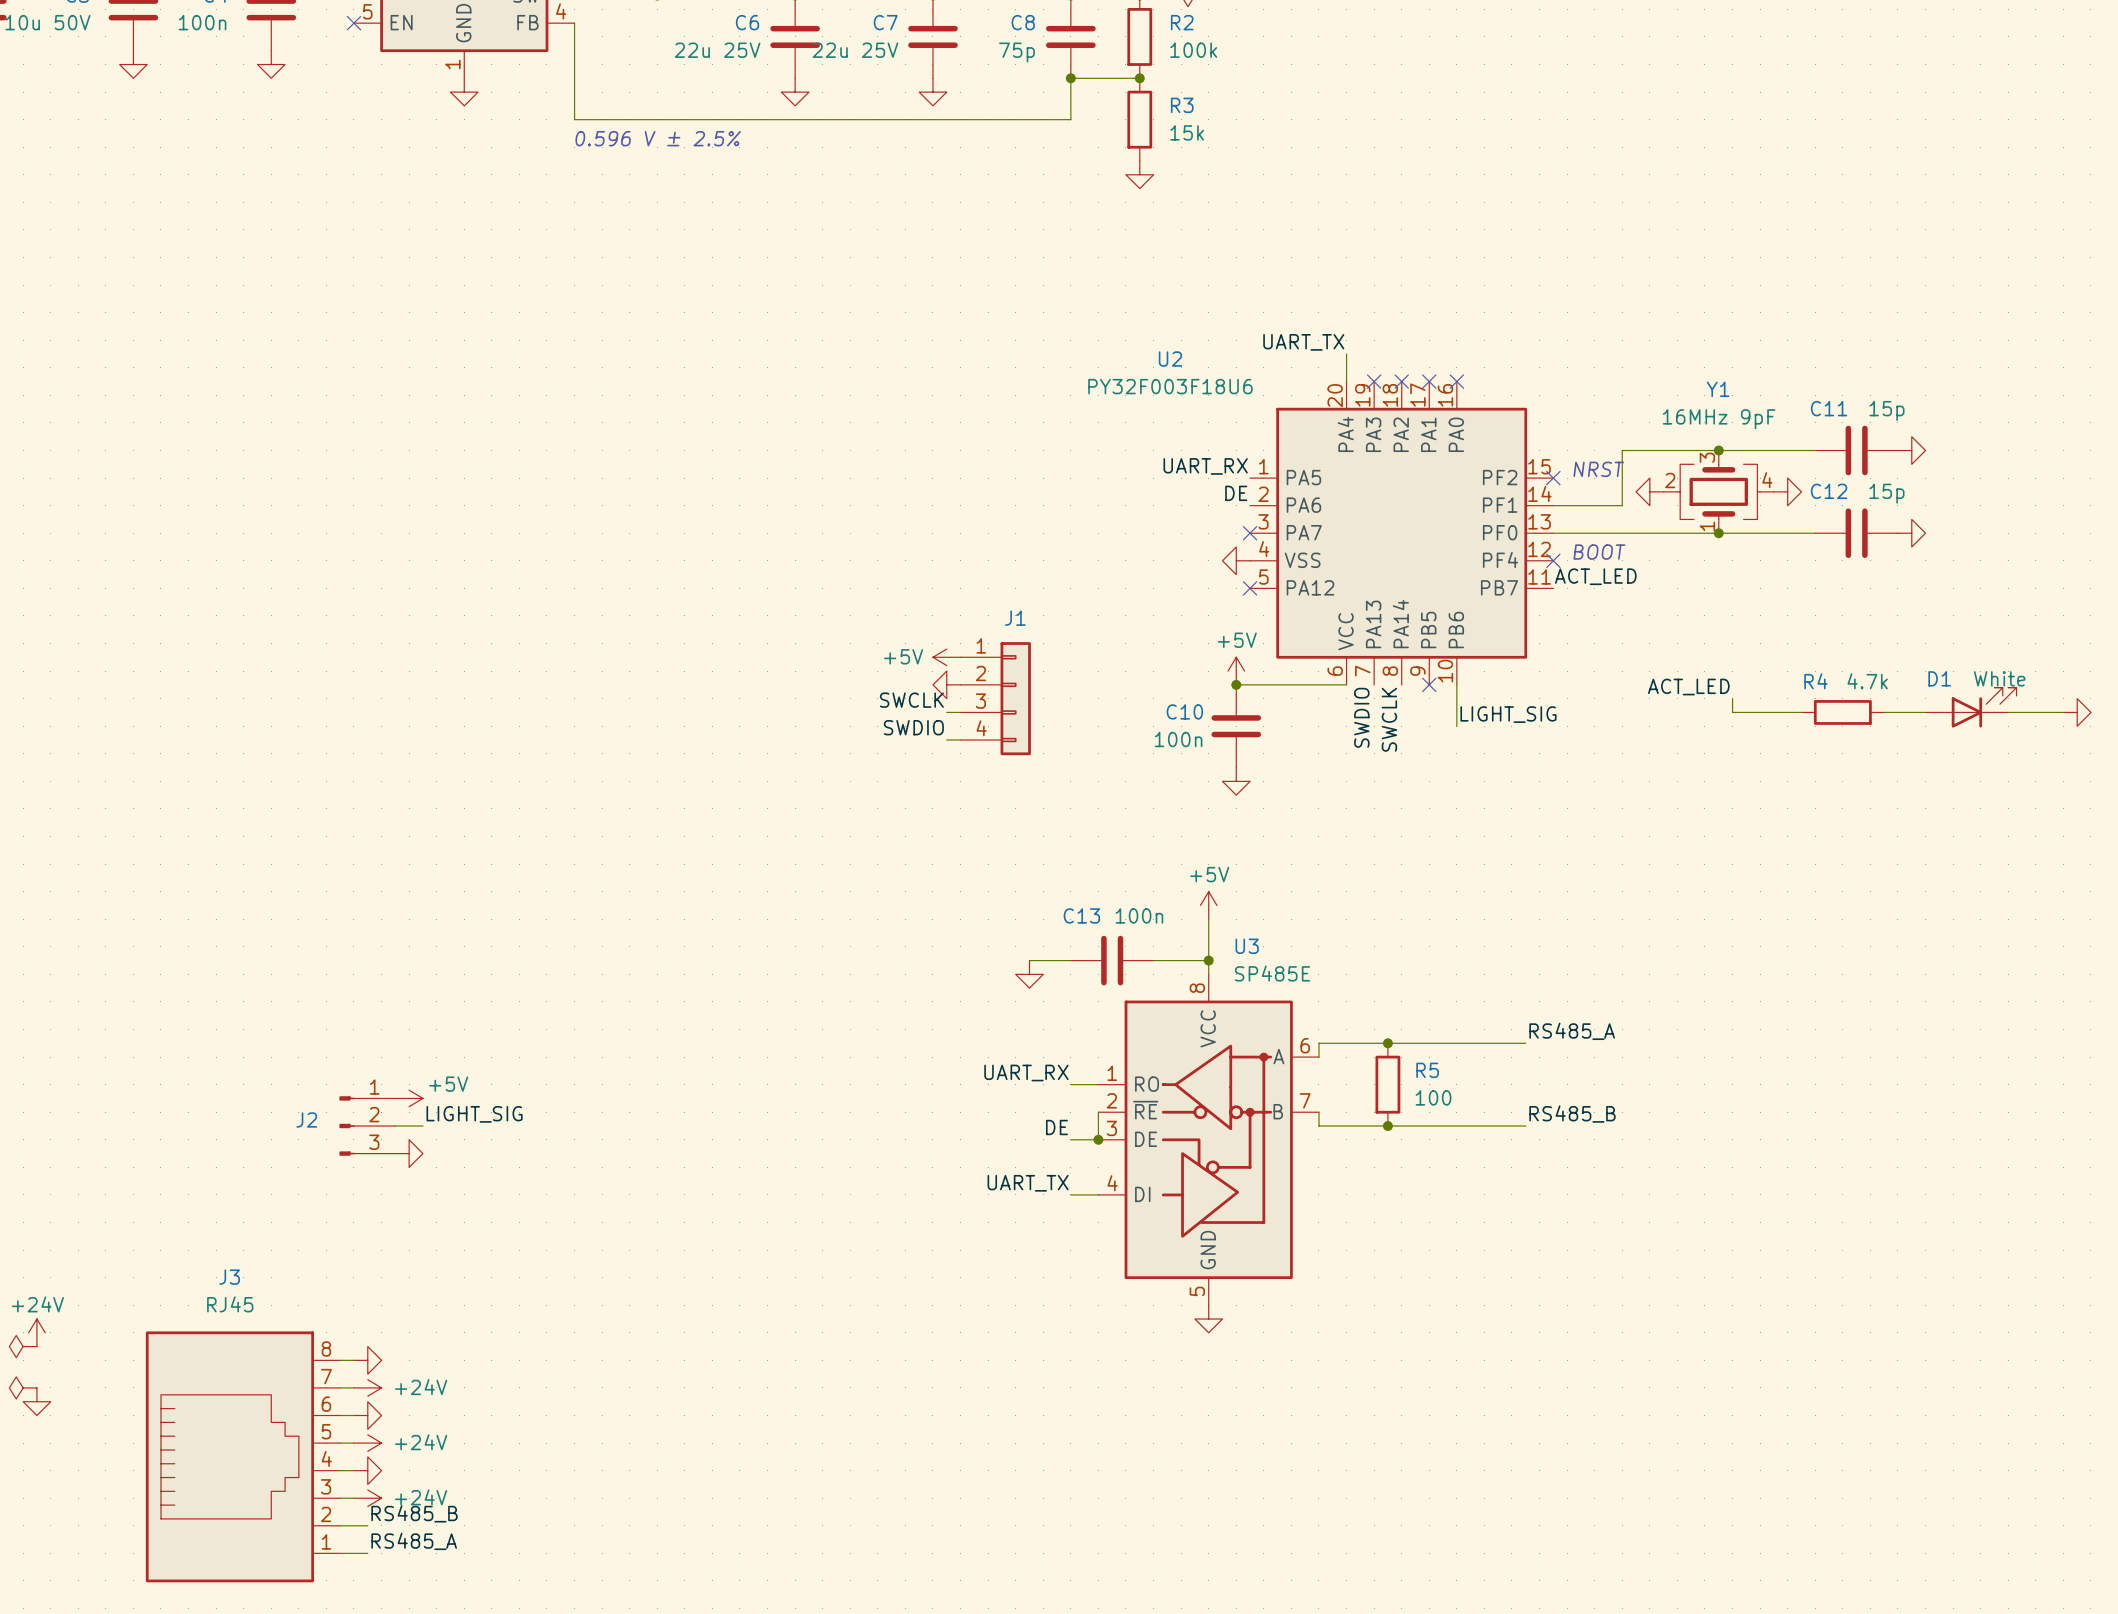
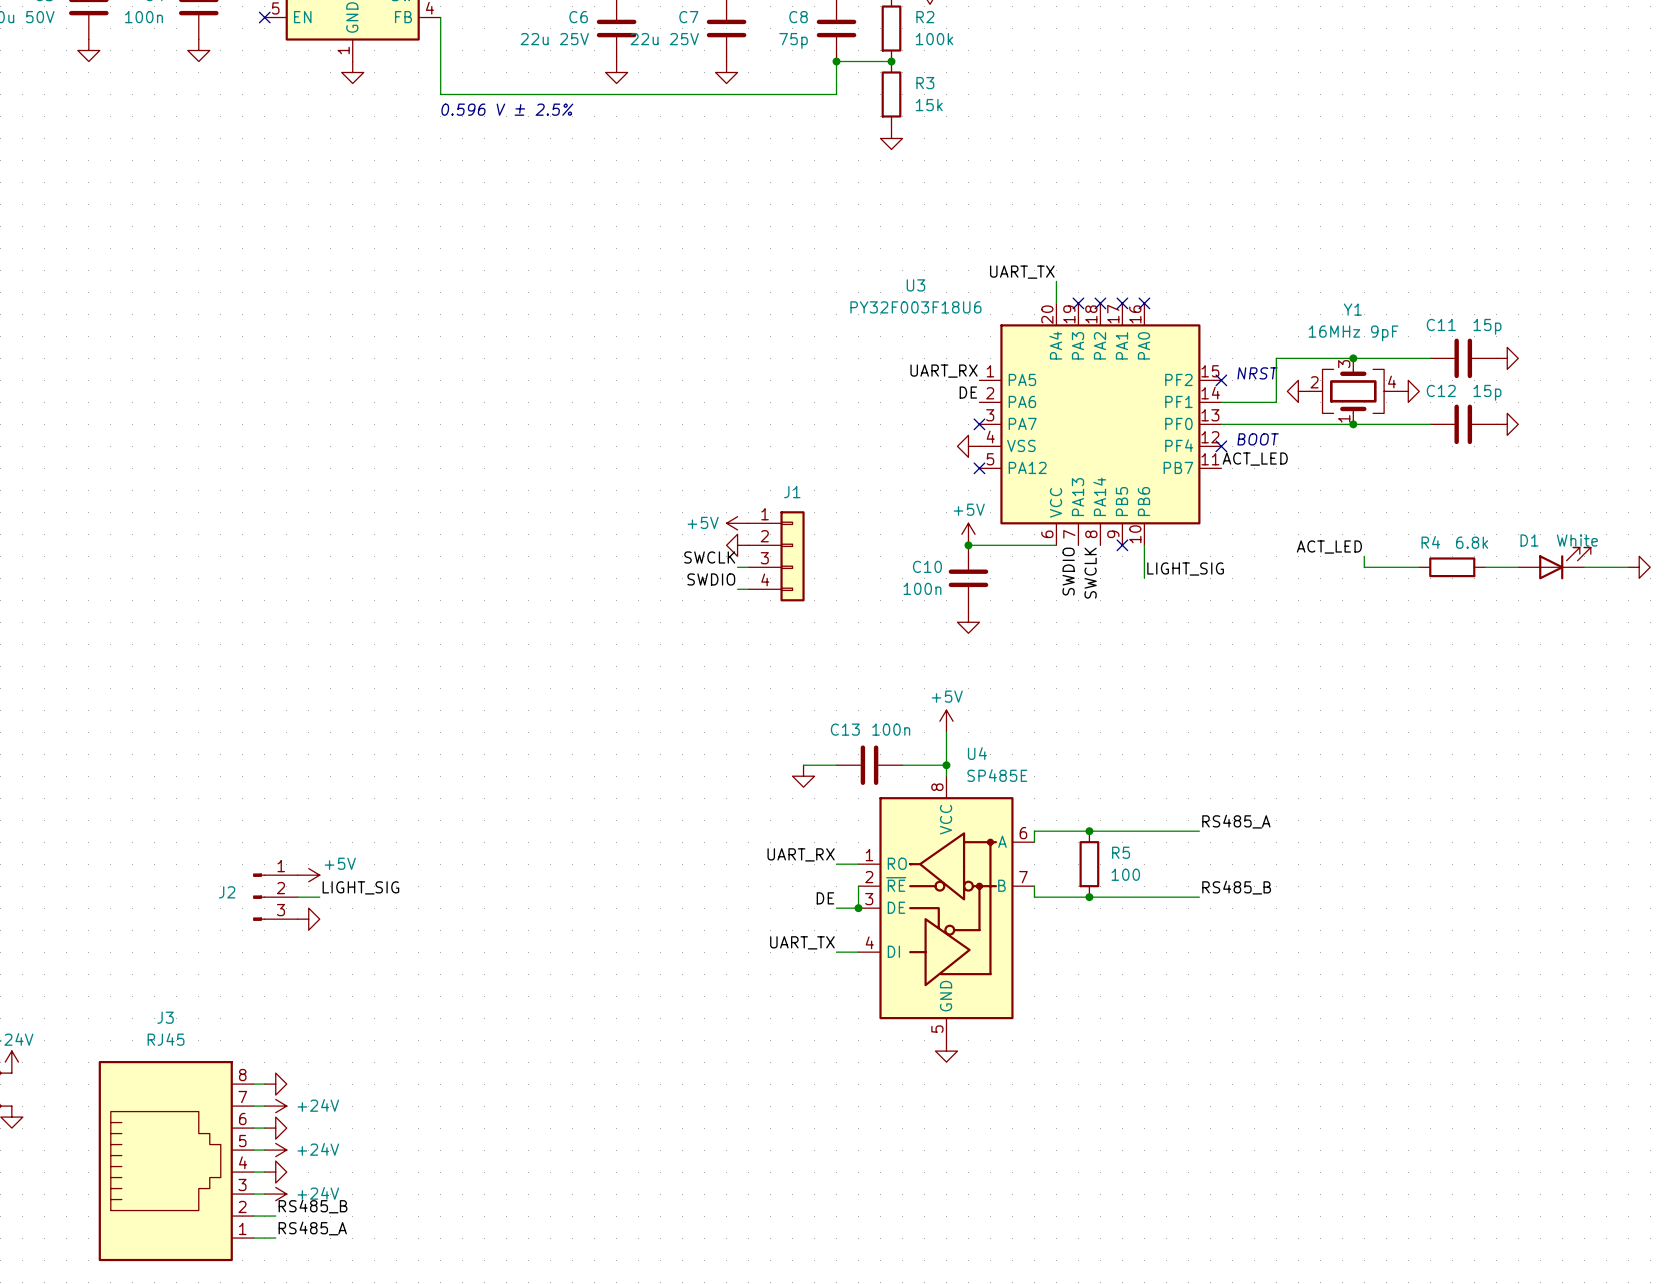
U2 name: U2 (1170, 359) -> U3 (915, 285)
R4 value: 4.7k (1867, 681) -> 6.8k (1472, 542)
U3 name: U3 (1247, 946) -> U4 (977, 753)

